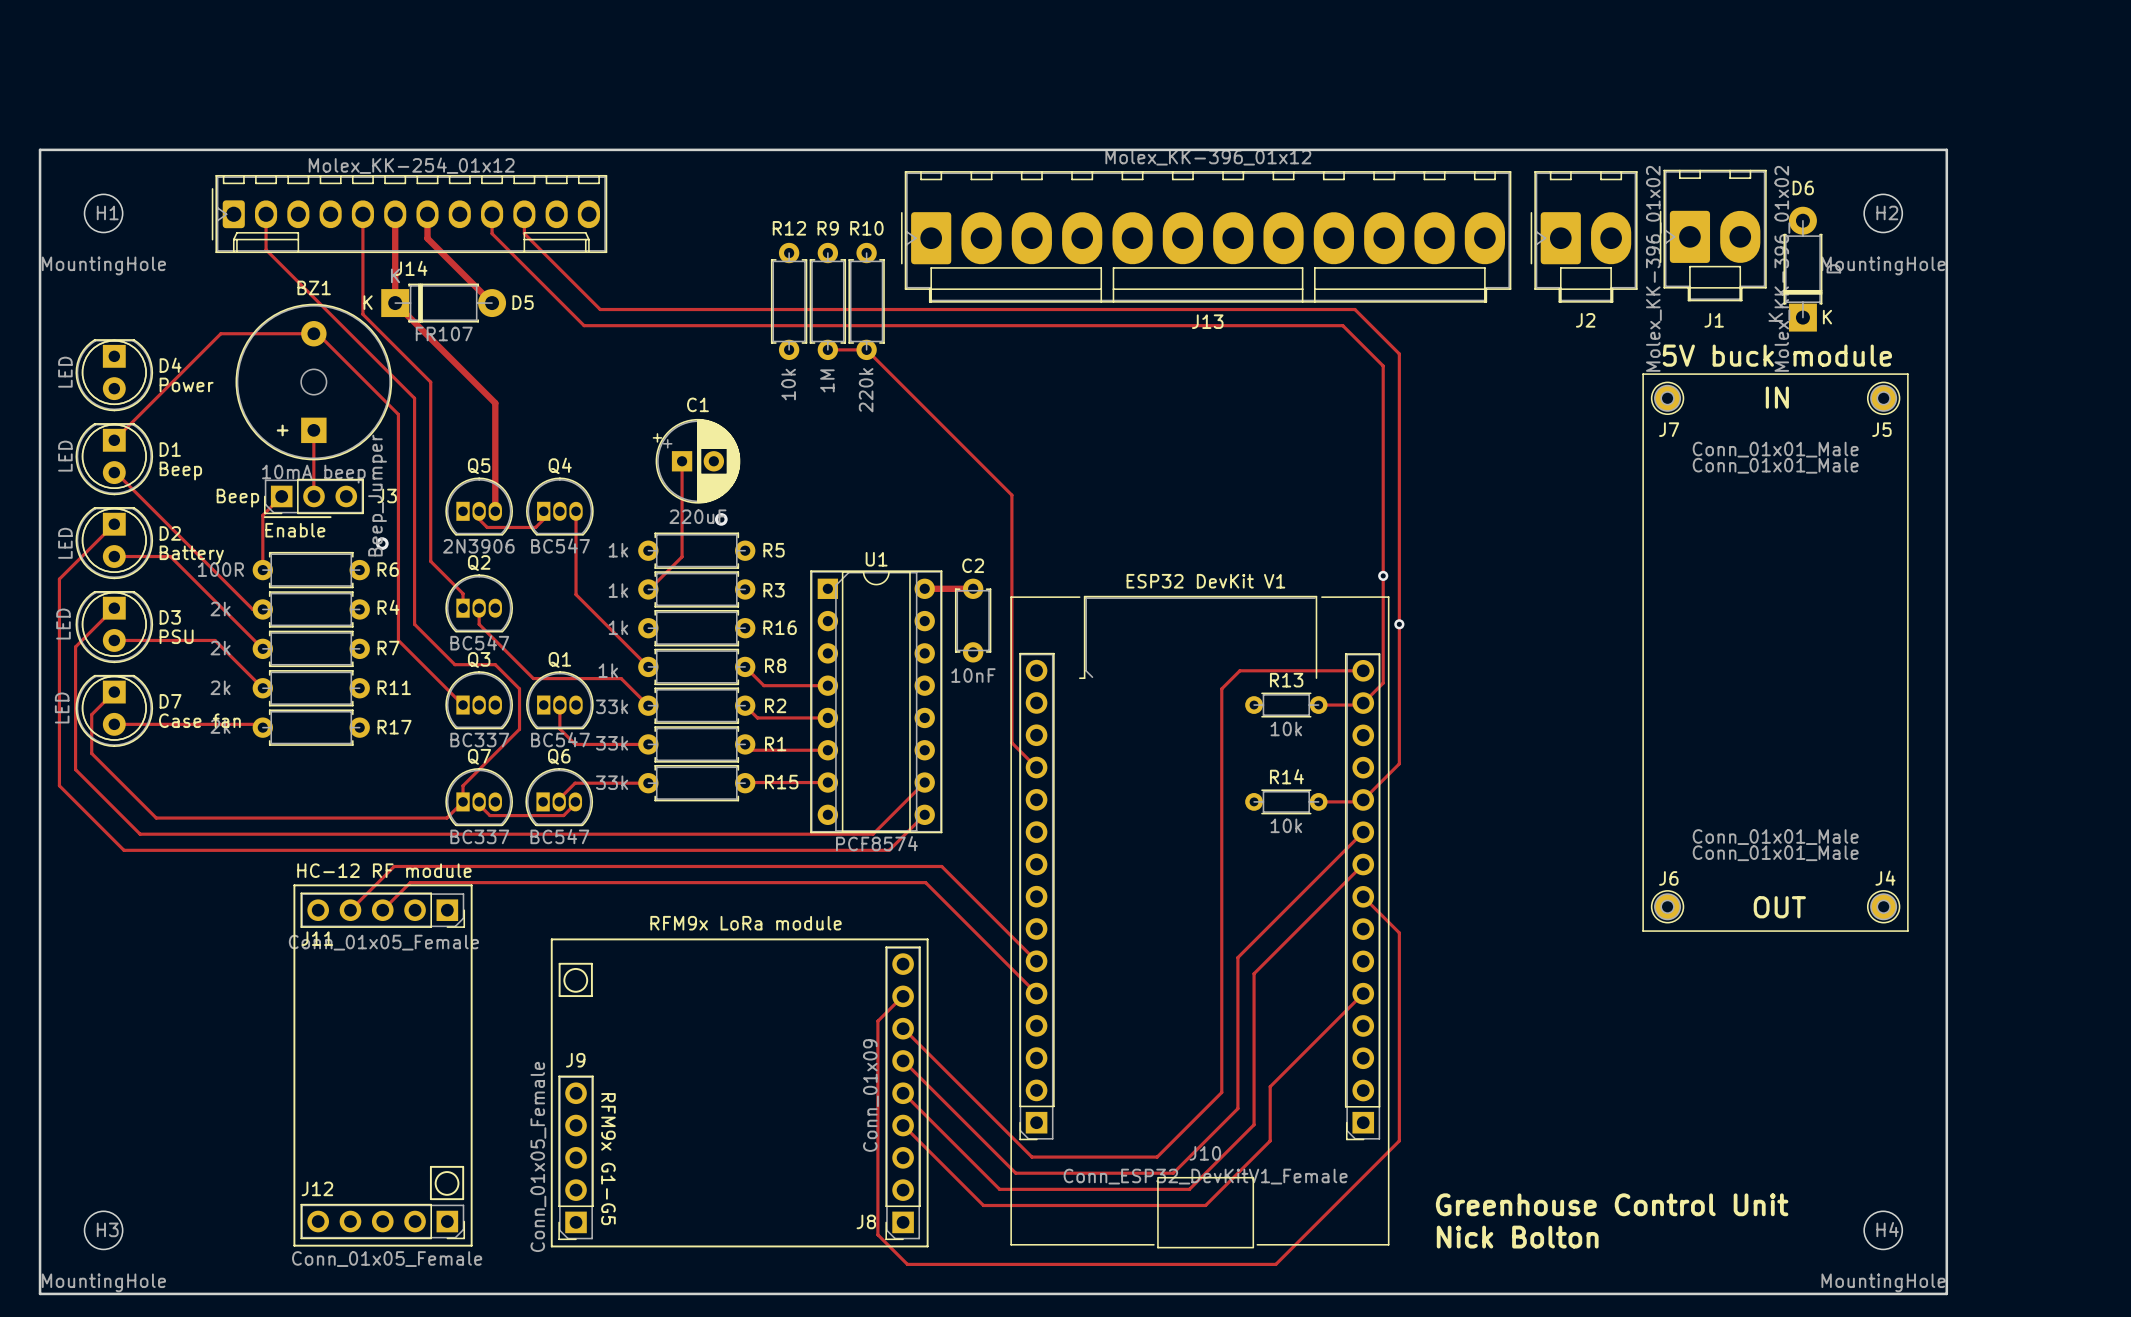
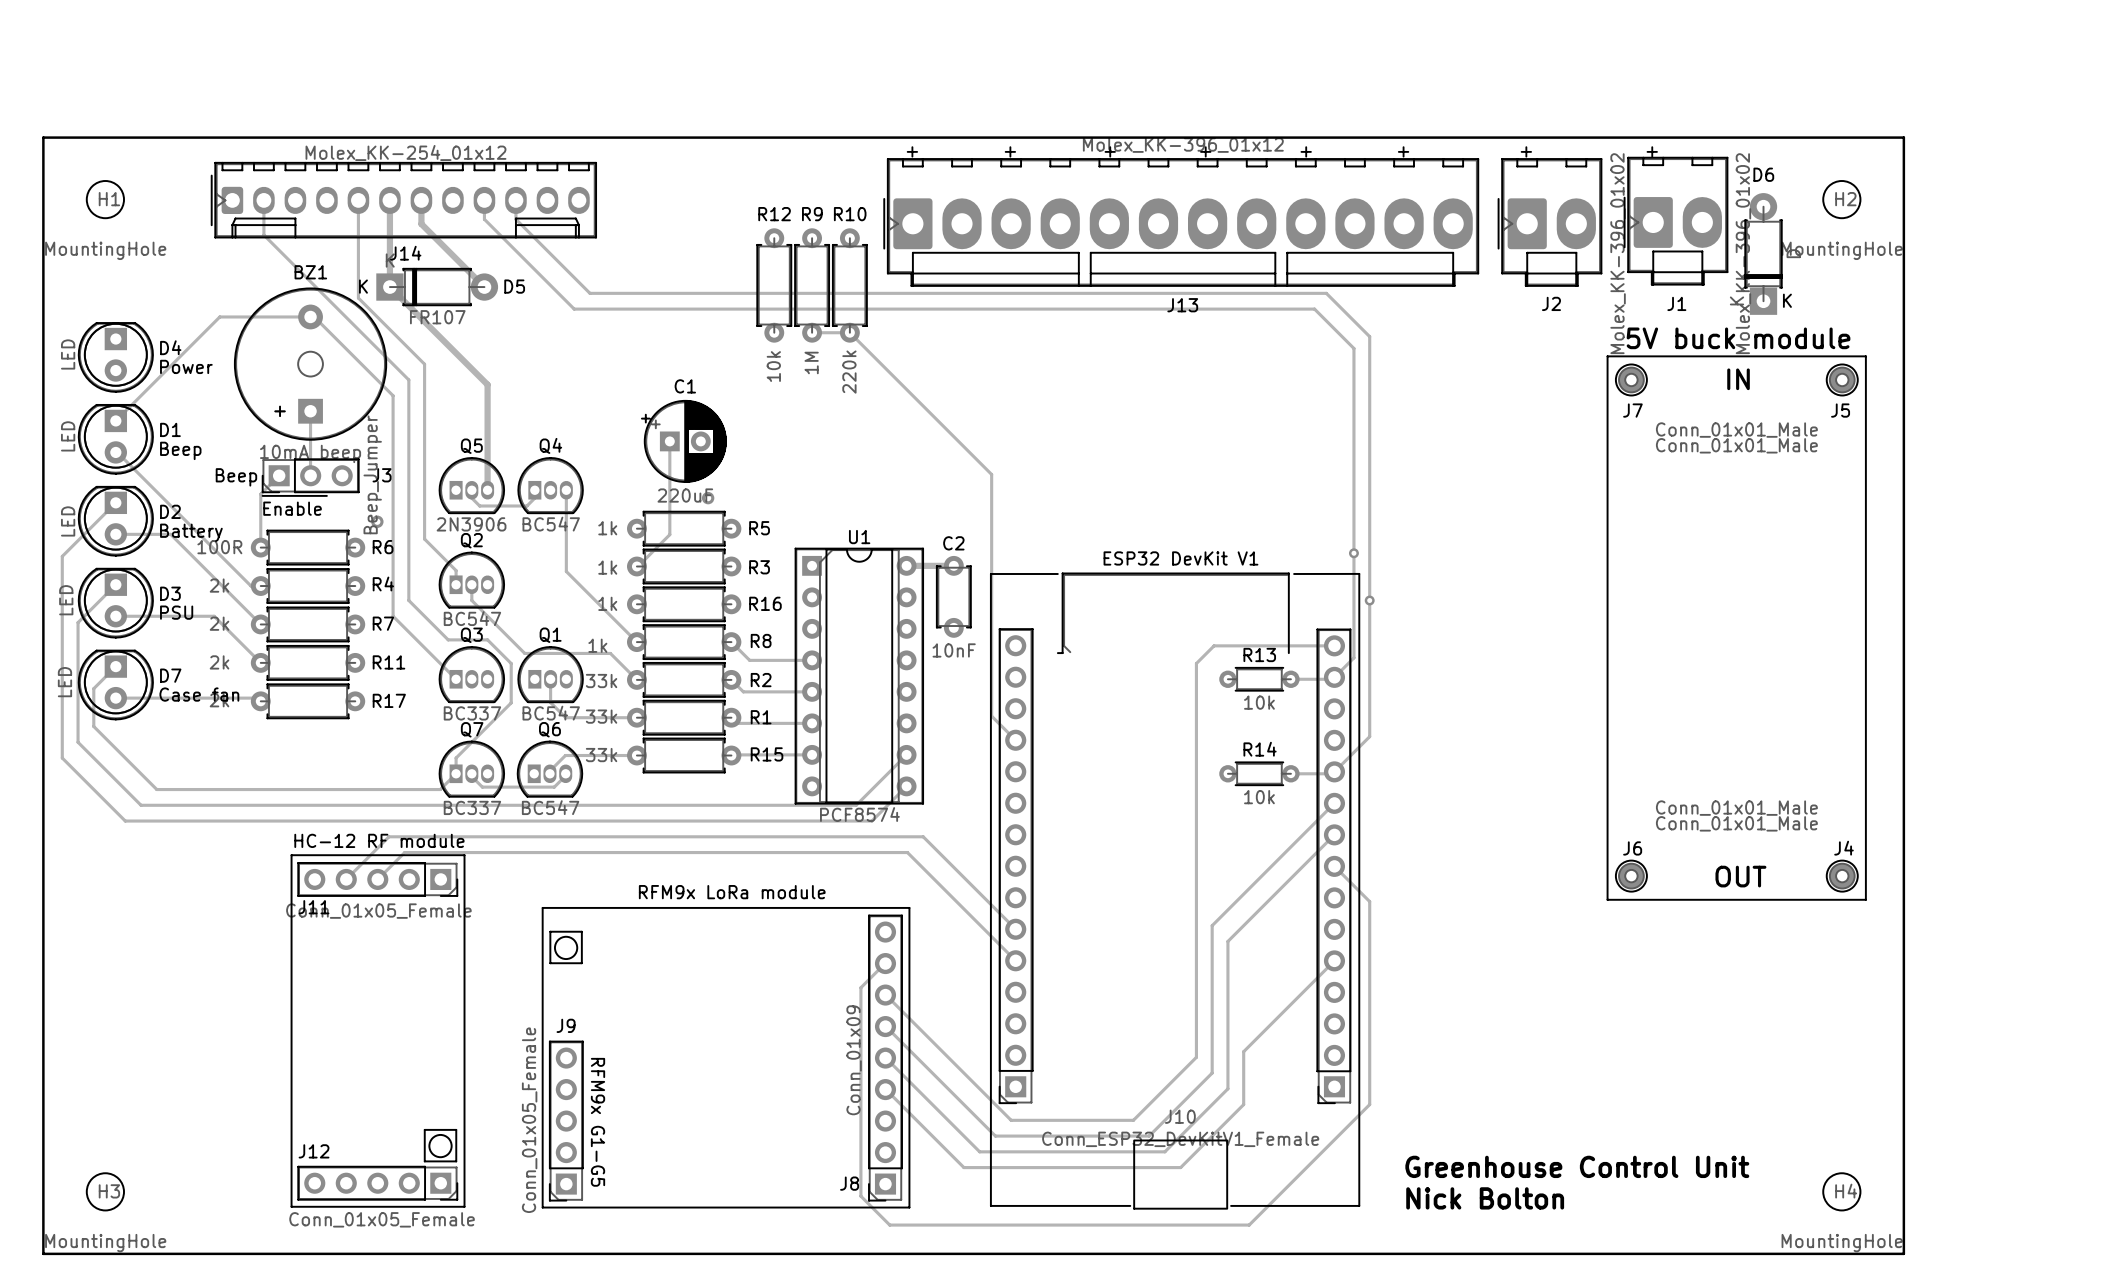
text: none -> + (912, 151)
text: none -> + (1010, 151)
text: none -> + (1110, 151)
text: none -> + (1205, 151)
text: none -> + (1306, 151)
text: none -> + (1403, 151)
text: none -> + (1526, 151)
text: none -> + (1652, 151)

